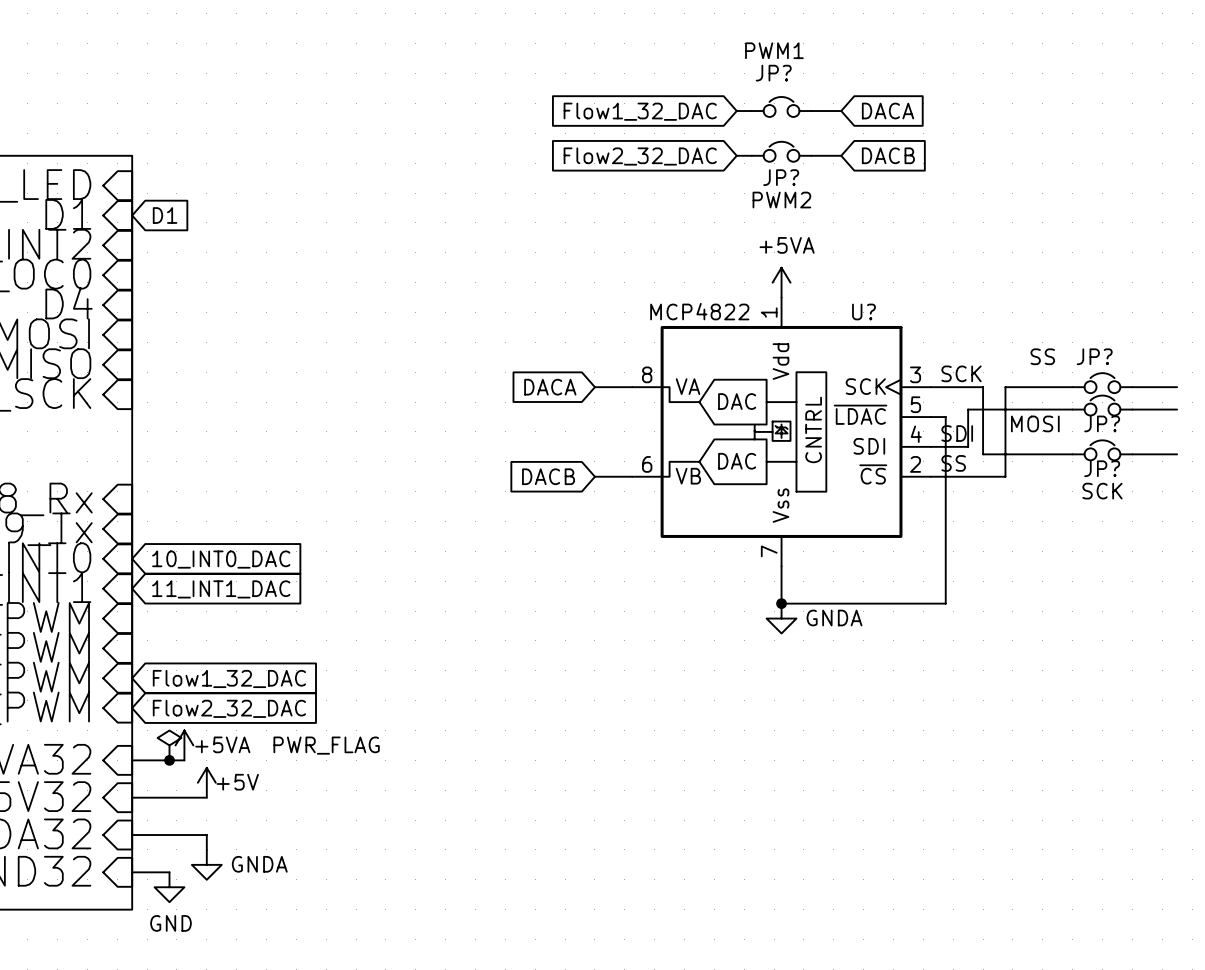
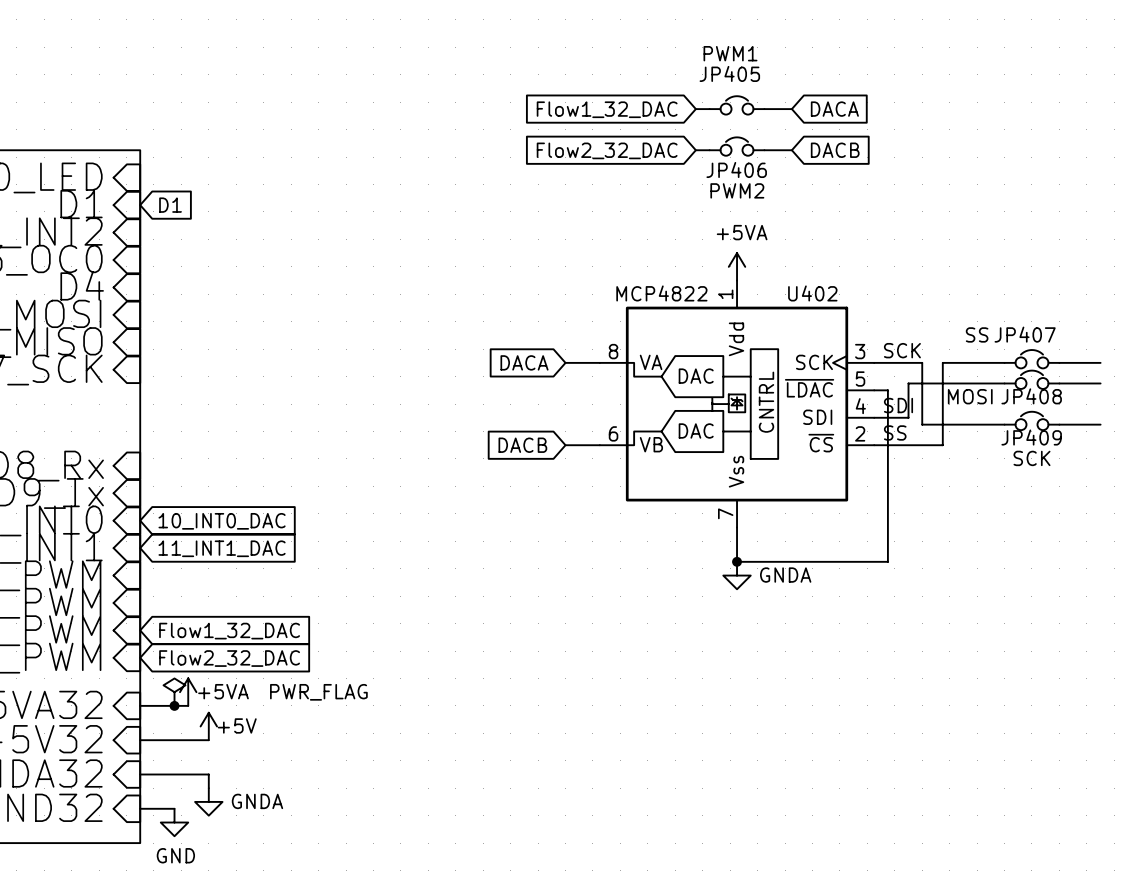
JP? name: JP? (773, 73) -> JP405 (729, 73)
JP? name: JP? (781, 177) -> JP406 (736, 169)
U? name: U? (864, 311) -> U402 (812, 293)
JP? name: JP? (1094, 356) -> JP407 (1025, 334)
JP? name: JP? (1102, 423) -> JP408 (1031, 396)
JP? name: JP? (1102, 468) -> JP409 (1031, 437)

